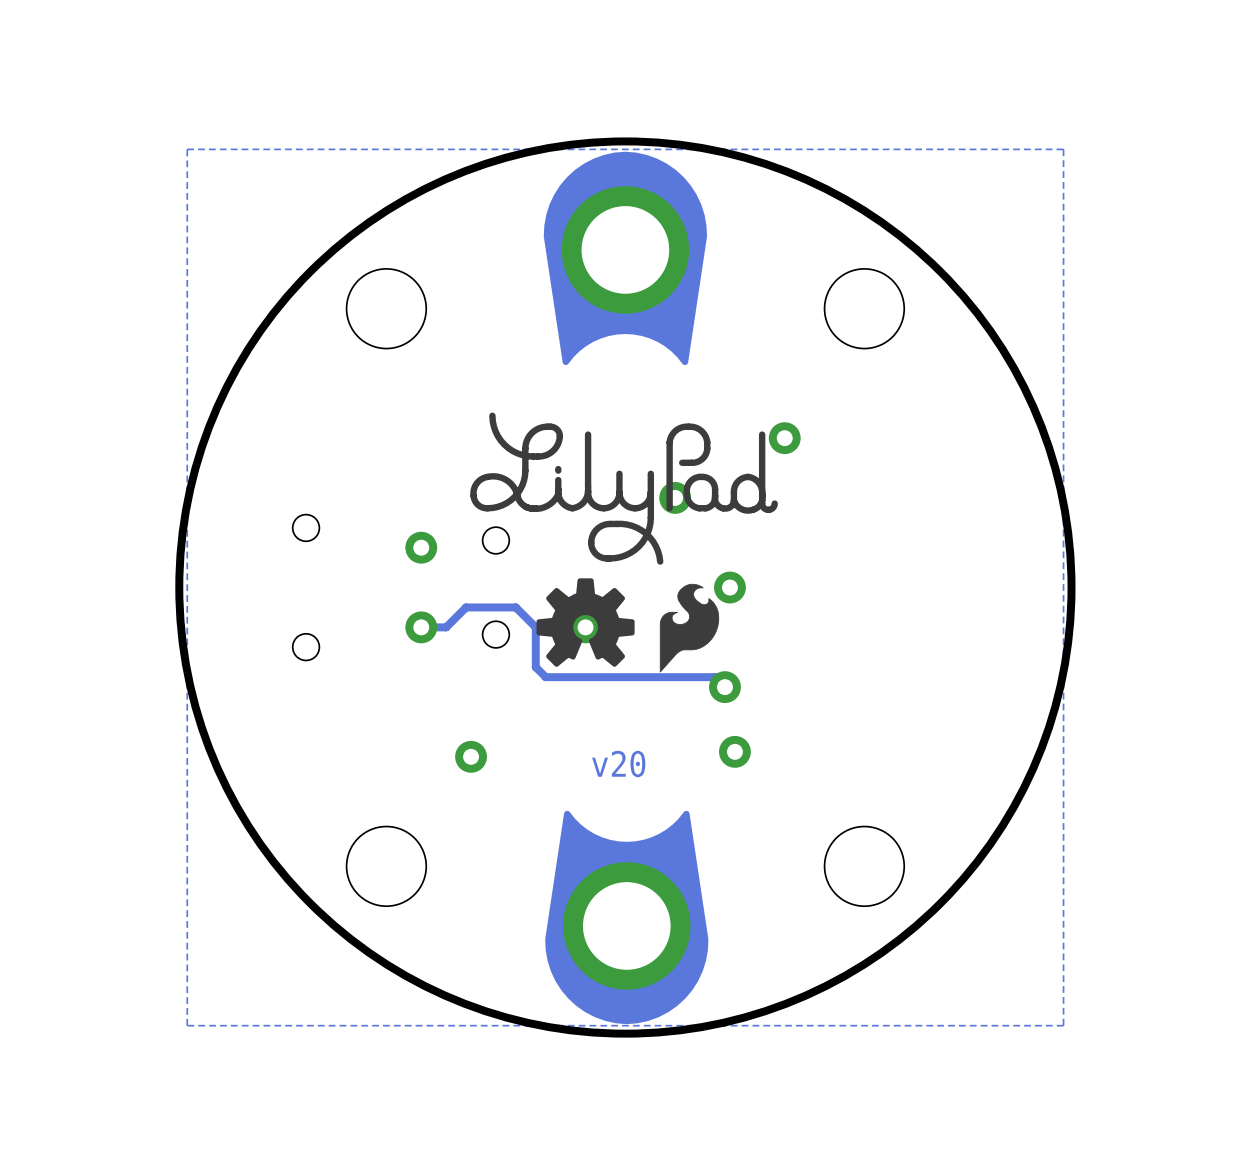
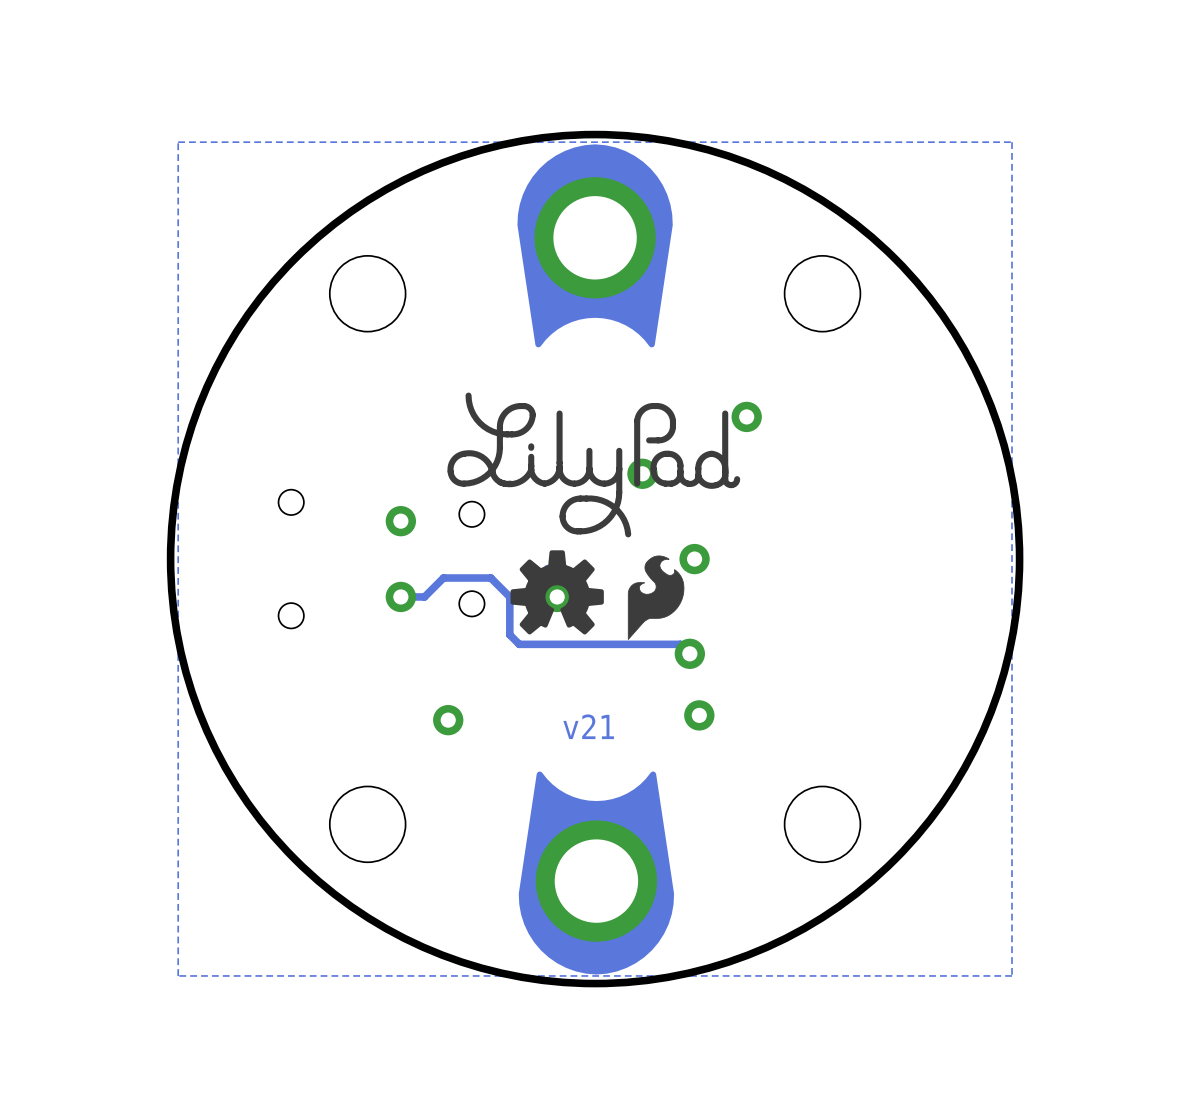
text: v20 (618, 764) -> v21 (588, 726)

